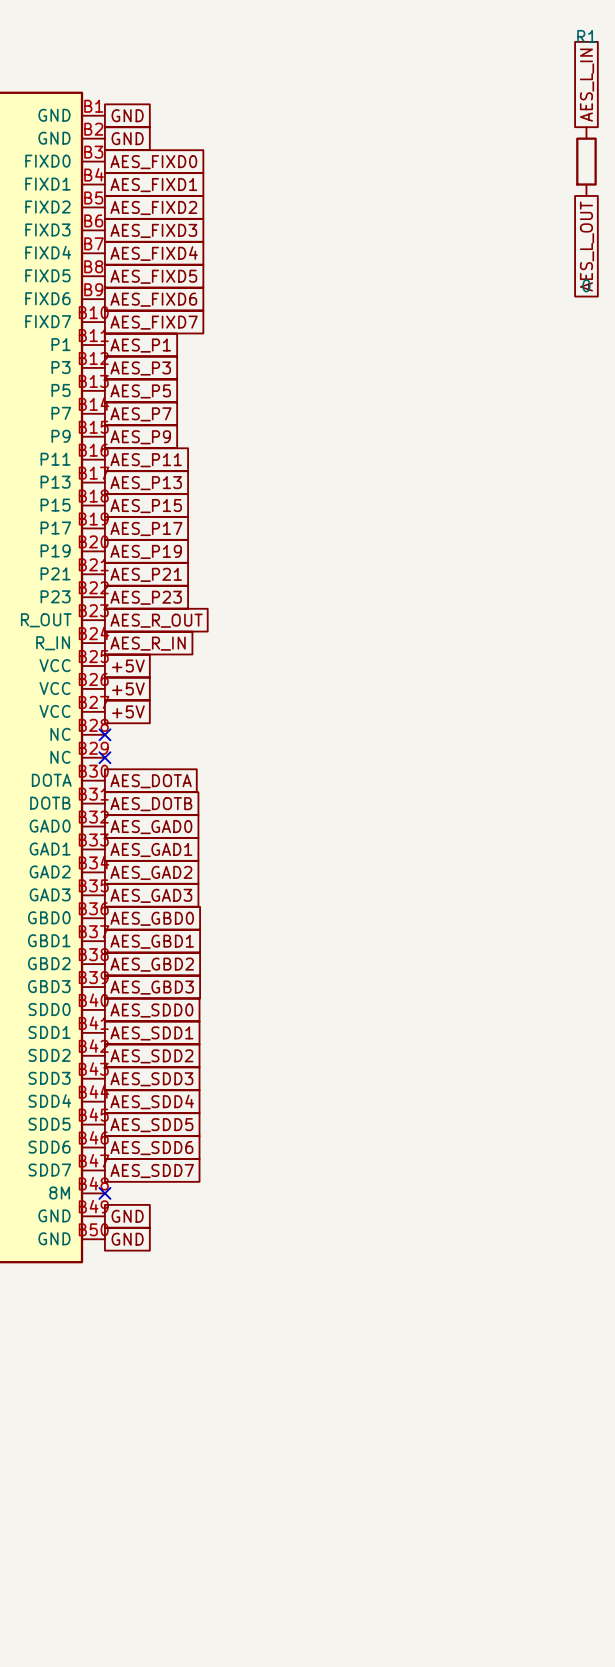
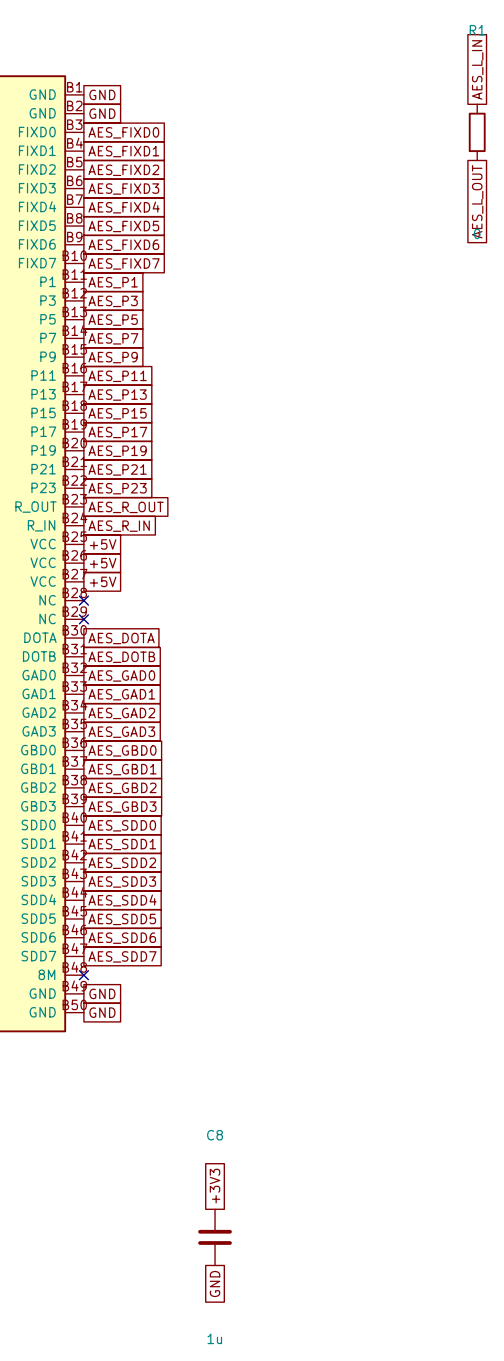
global label: none -> +3V3 (215, 1186)
C8: none -> 1u (215, 1237)
global label: none -> GND (215, 1284)

